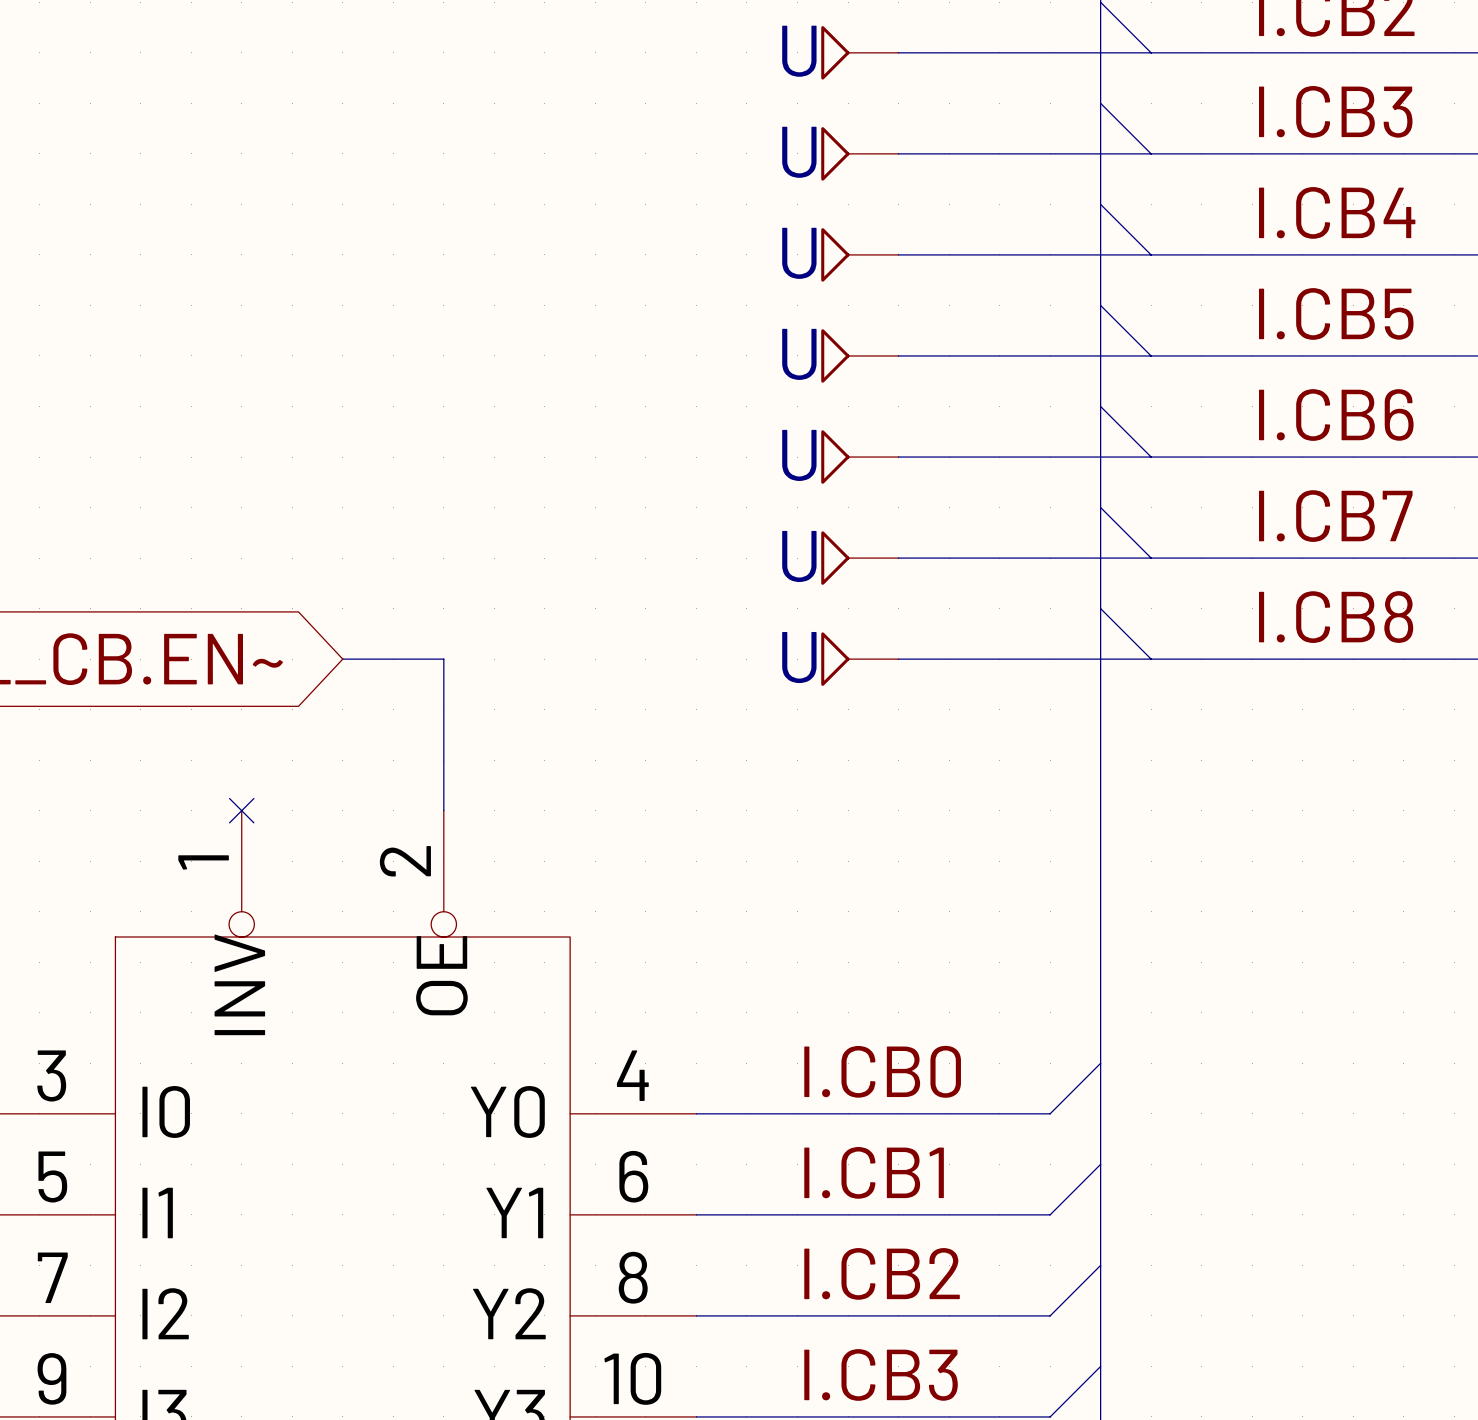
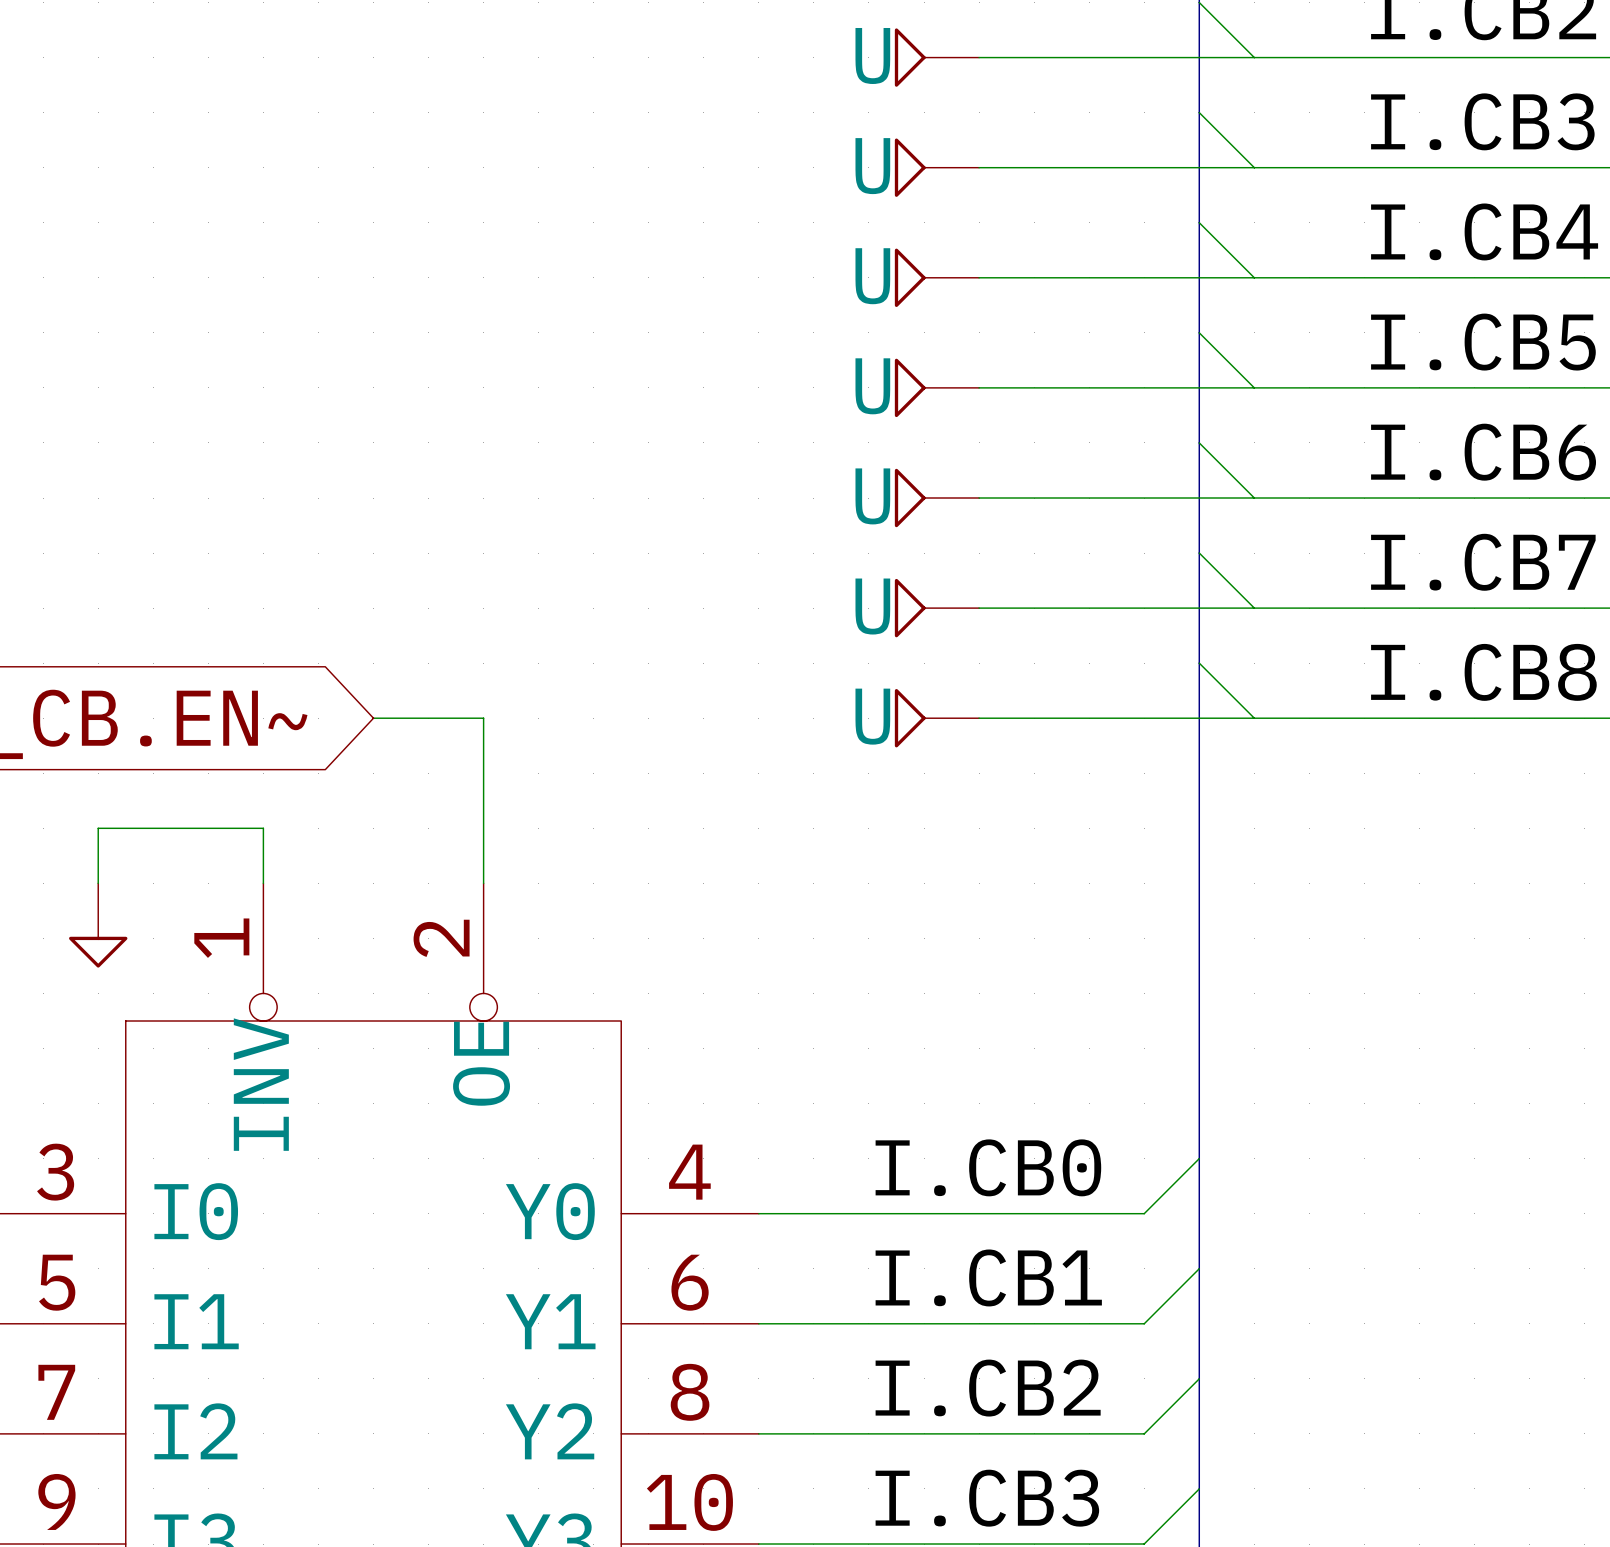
wire: none -> (98, 883) (98, 828) (263, 828) (263, 883)
no-connect mark: (241, 810) -> none
power symbol: none -> (98, 925)

